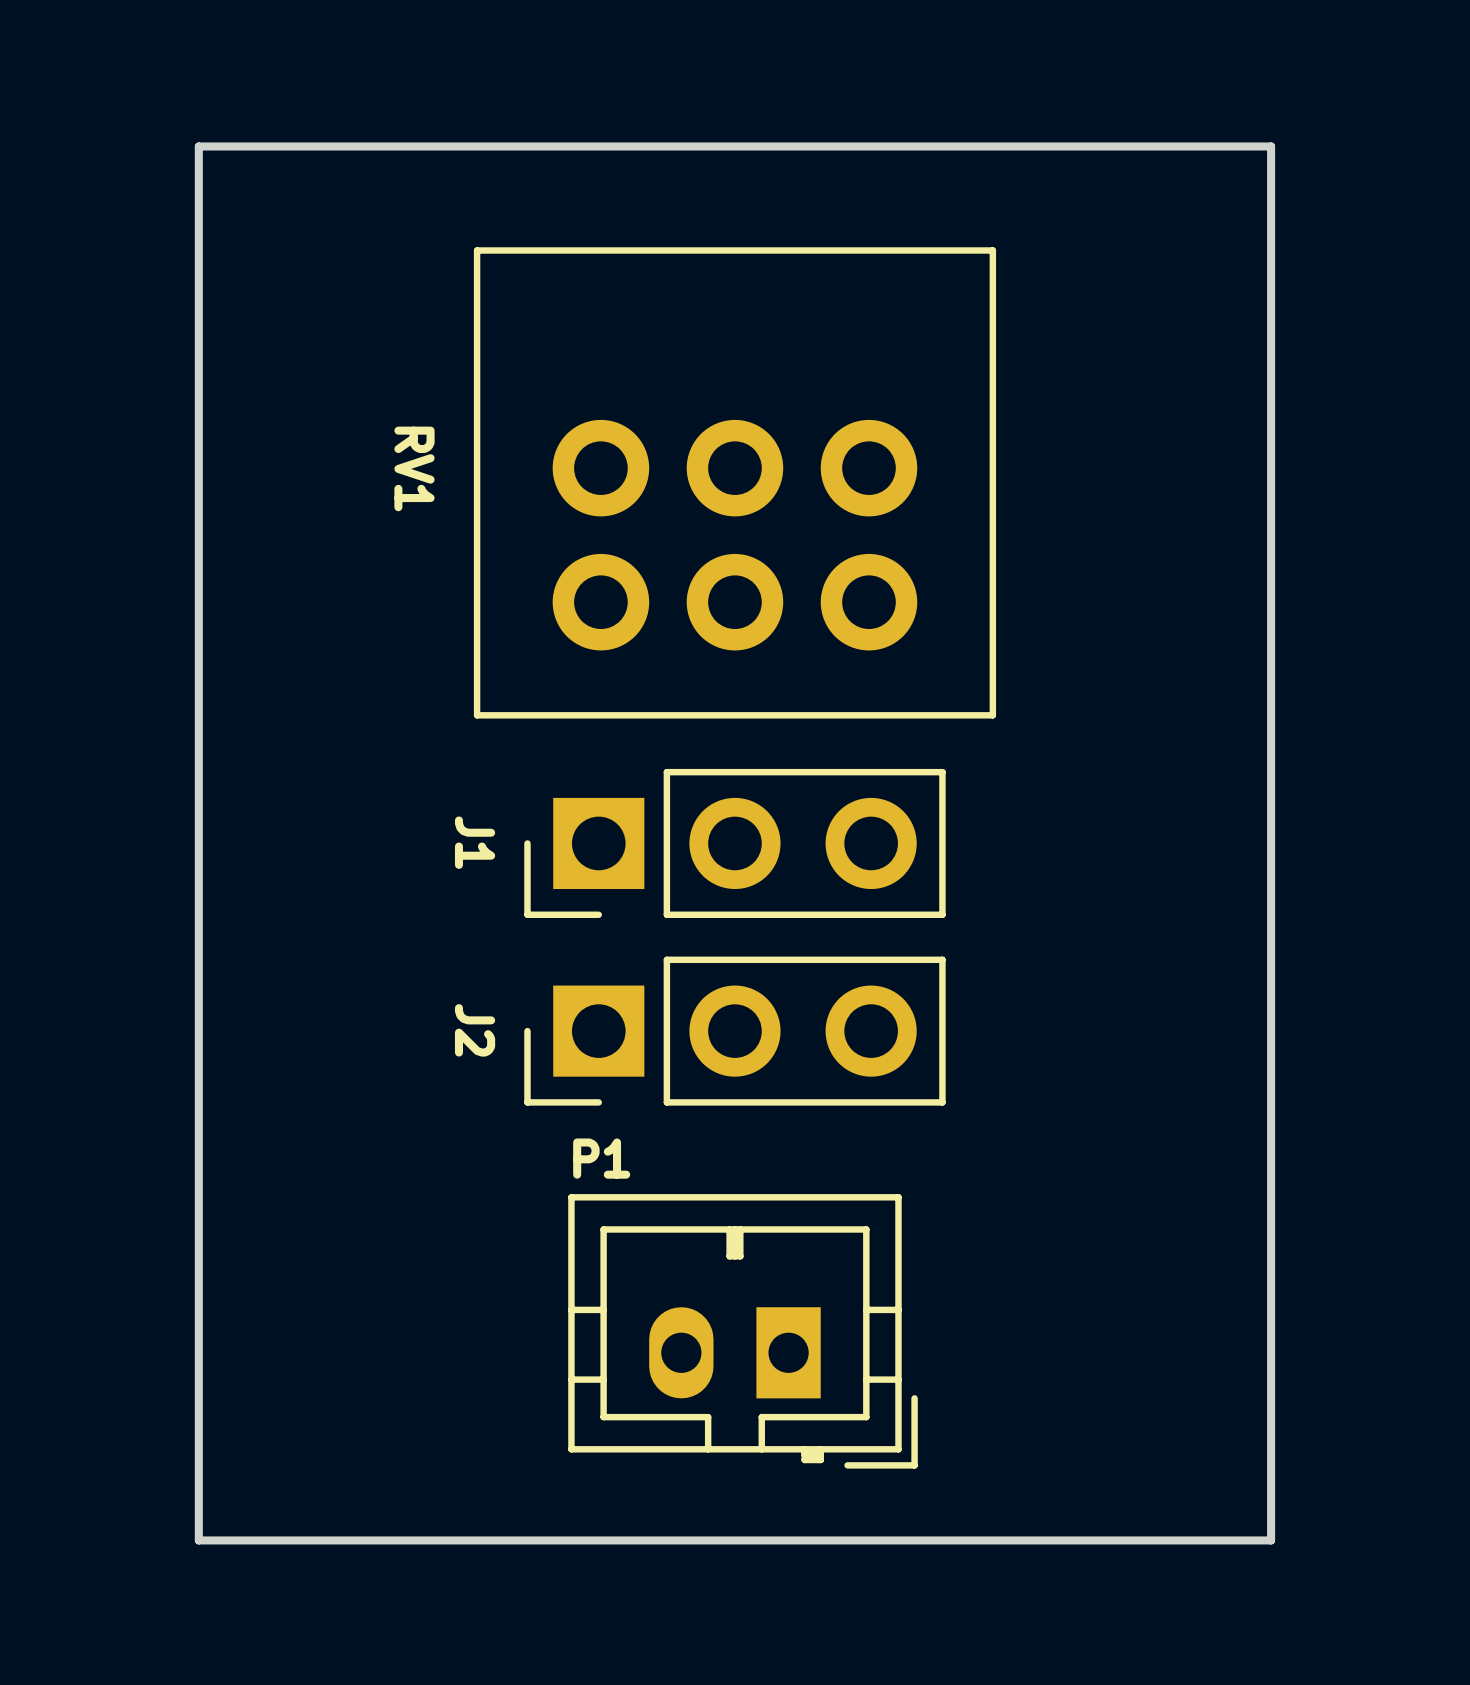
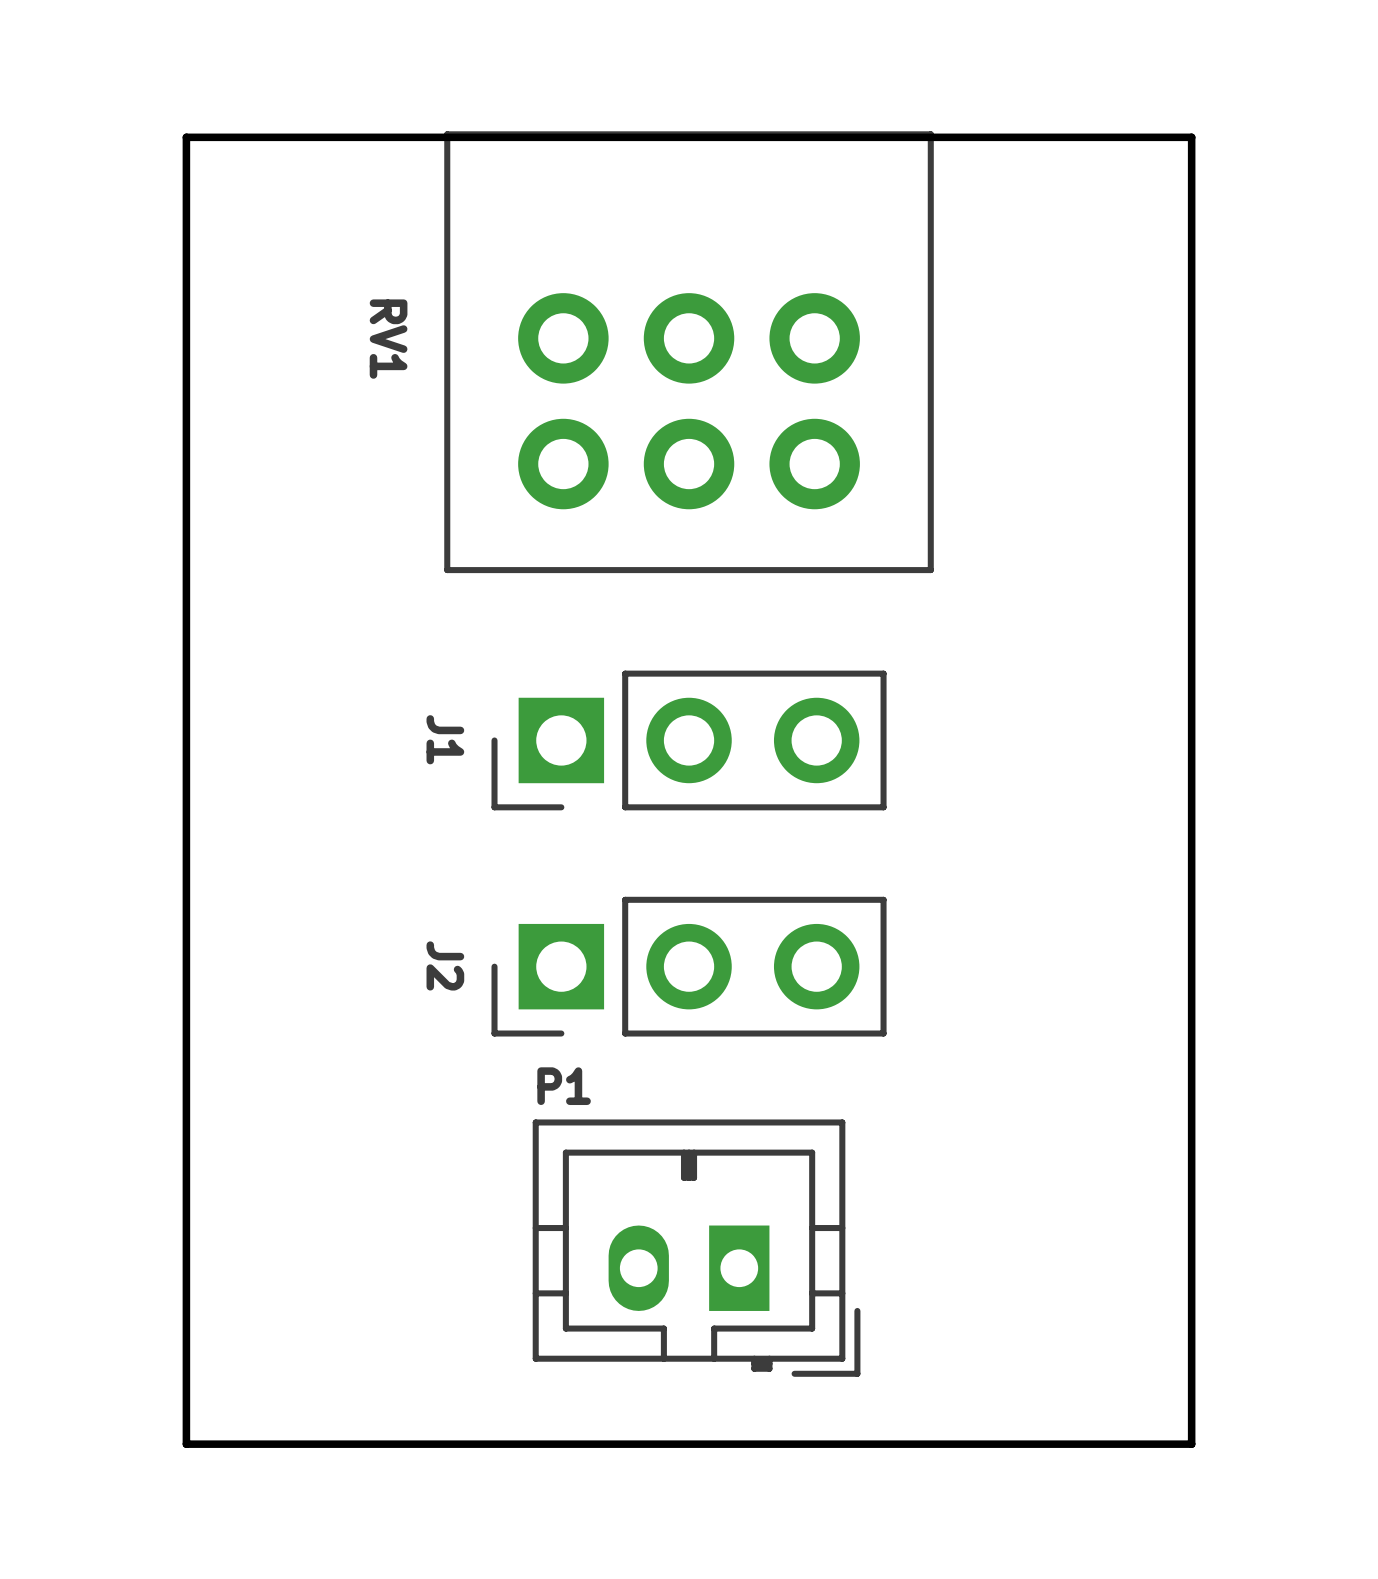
RV1 position: (734, 482) -> (689, 352)
J1 position: (734, 843) -> (689, 740)

